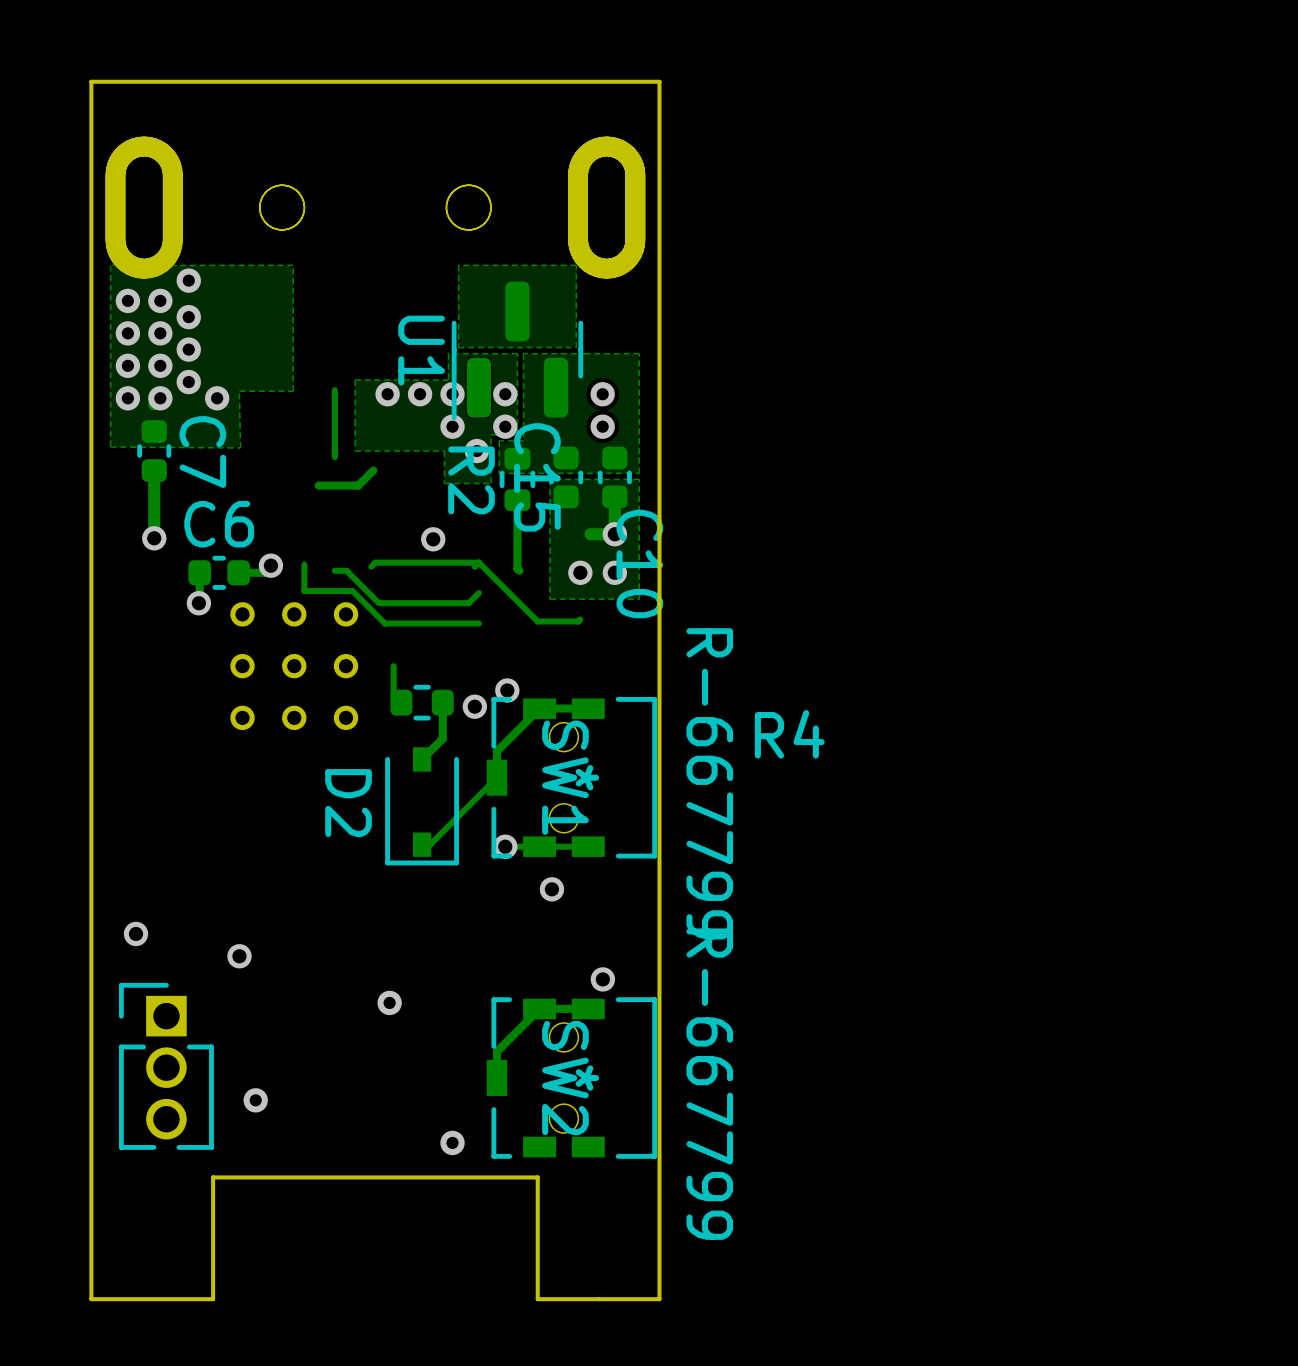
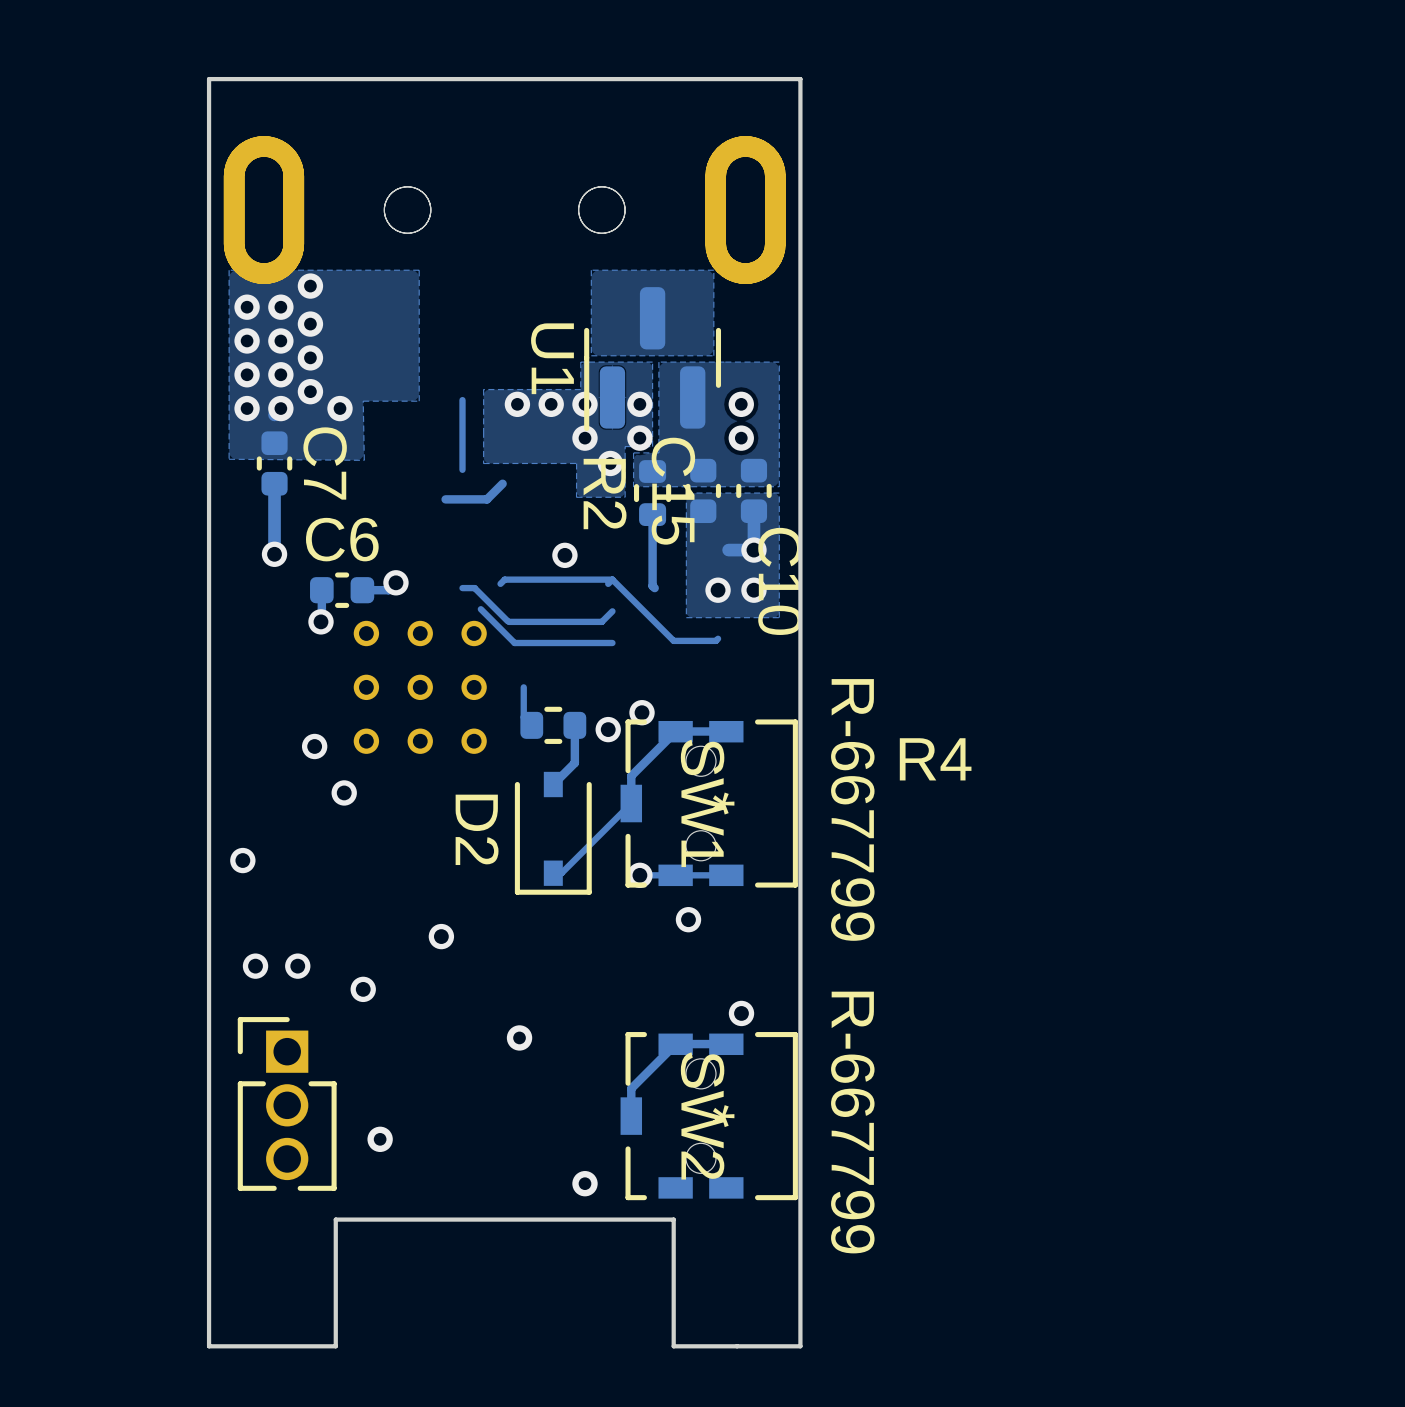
track: (304, 564) (304, 591) (352, 591) -> none
via: none -> (314, 746)
via: none -> (344, 792)
via: none -> (242, 860)
via: none -> (441, 936)
via: none -> (297, 966)

